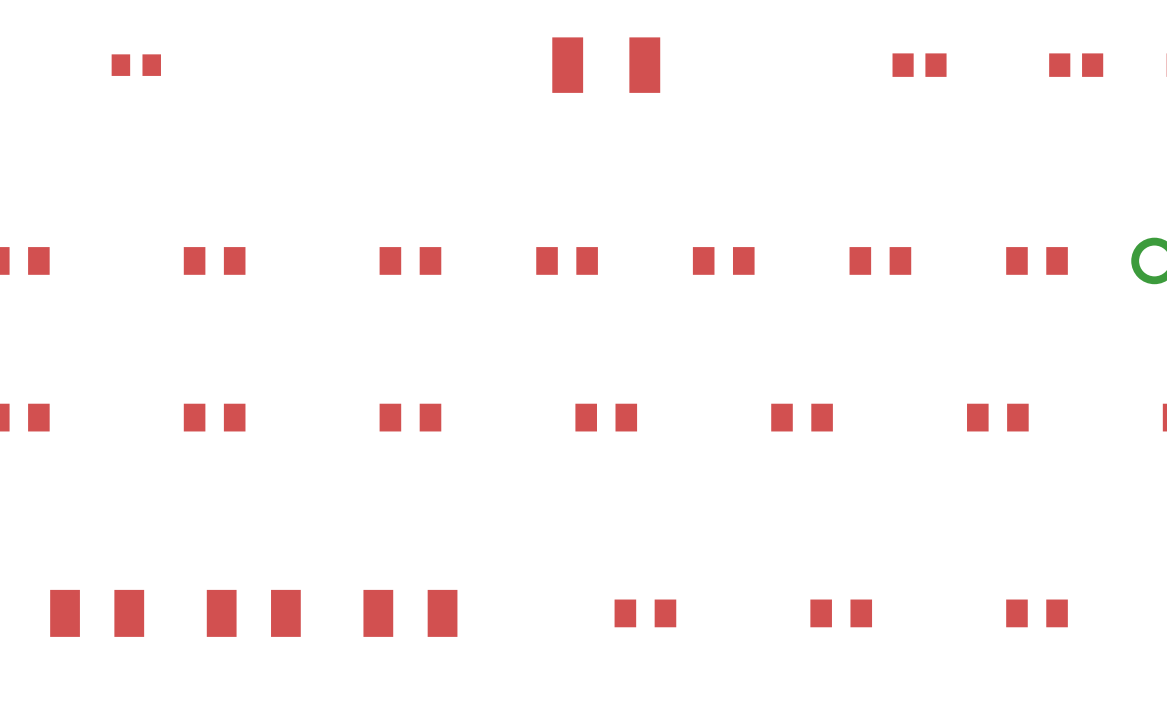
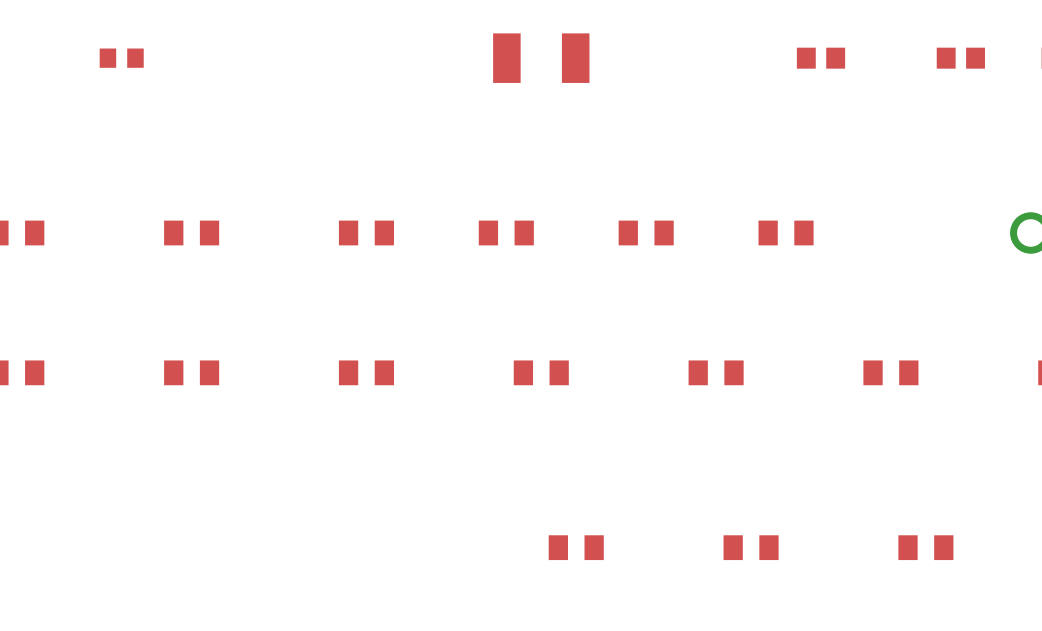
part: (1037, 260) -> none
part: (97, 613) -> none
part: (253, 613) -> none
part: (410, 613) -> none

